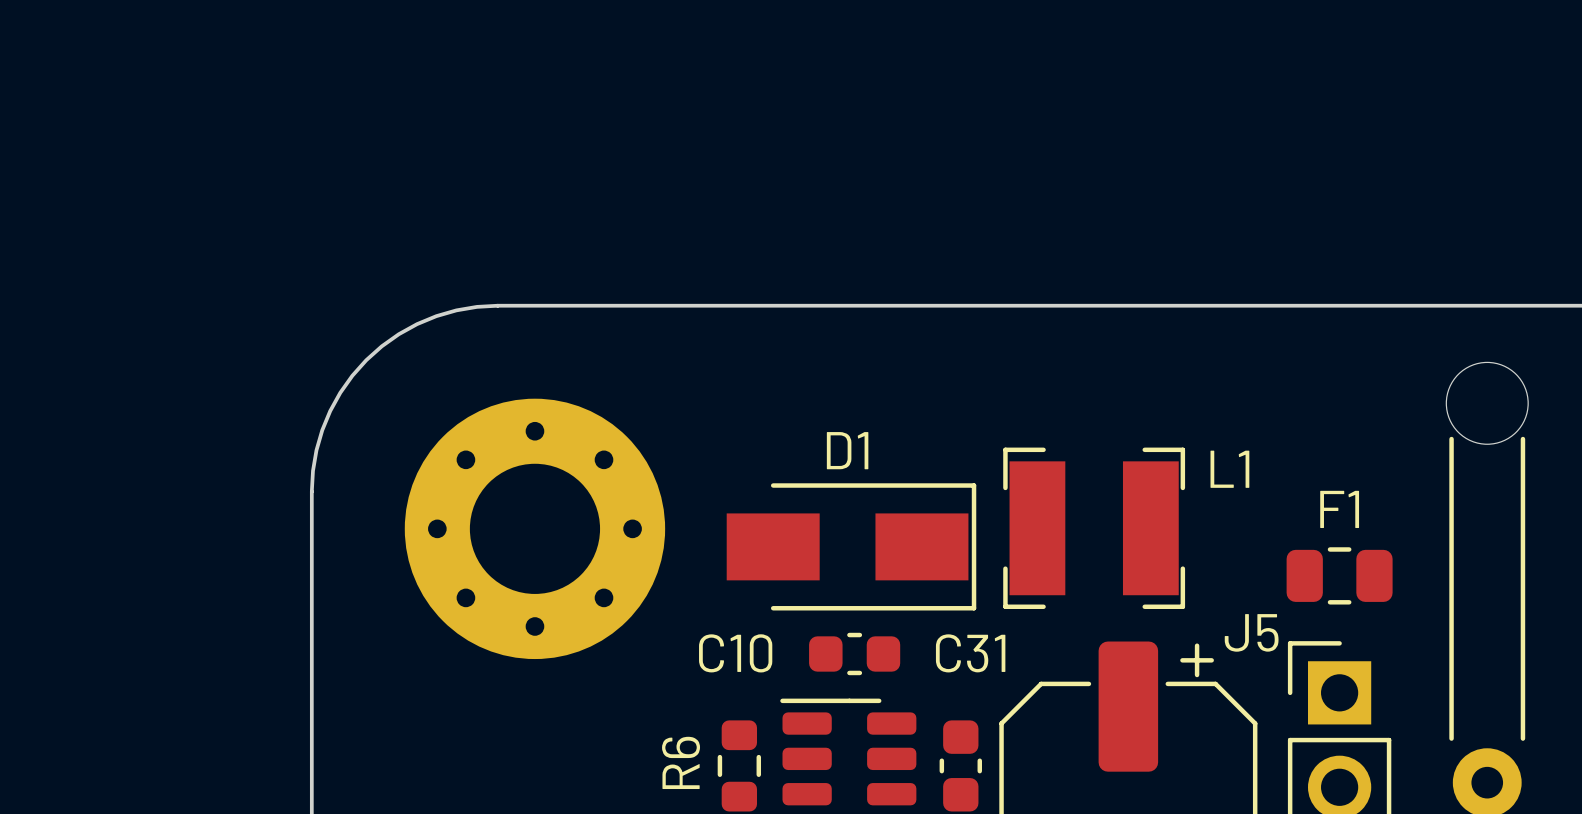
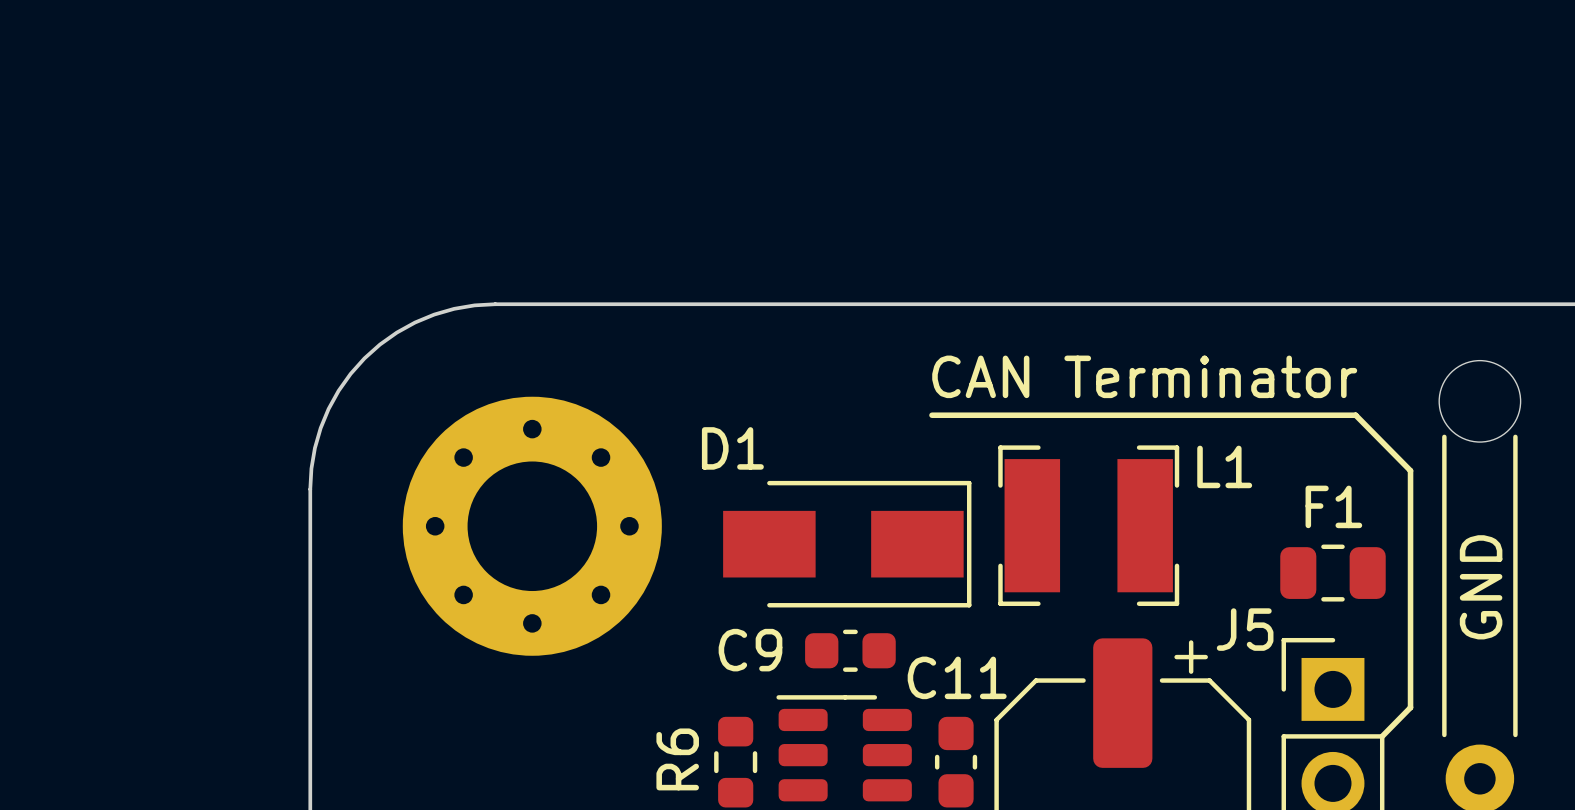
text: none -> CAN Terminator (1144, 376)
line: none -> (931, 415) (1355, 415) (1410, 470) (1410, 707) (1382, 736)
D1 name position: D1 (847, 450) -> D1 (732, 448)
text: none -> GND (1481, 587)
C10 name: C10 (735, 653) -> C9 (750, 650)
C31 name: C31 (970, 653) -> C11 (957, 677)

